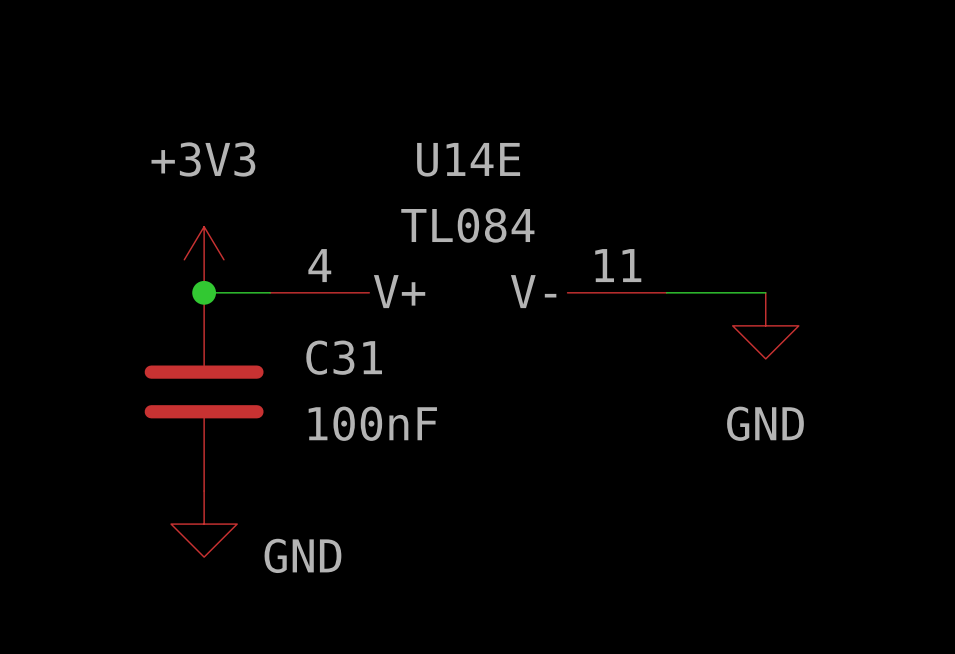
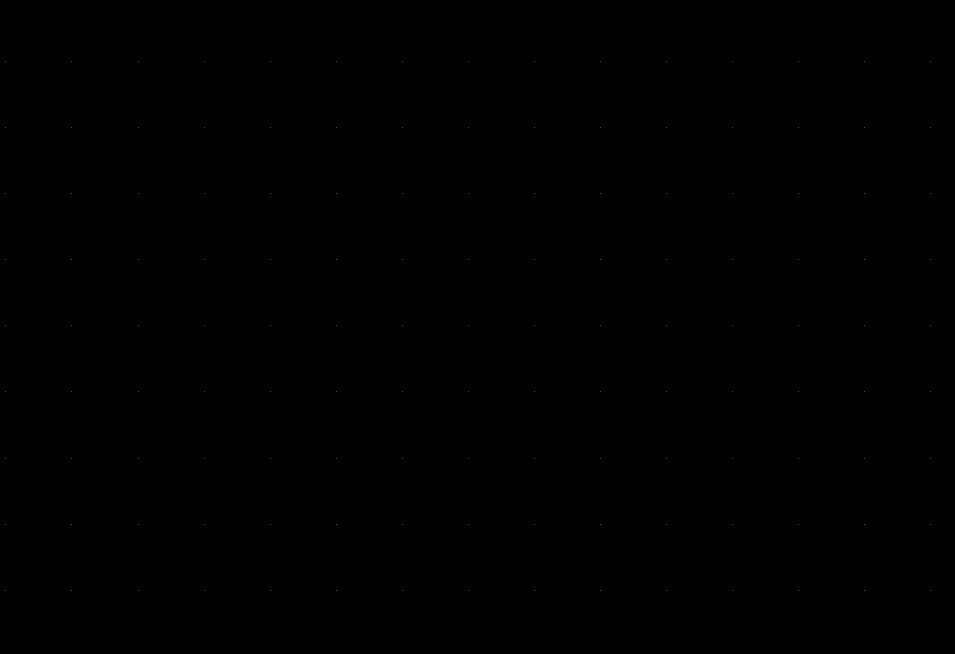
power symbol: +3V3 (204, 259) -> none
wire: (204, 292) (270, 292) -> none
junction: (204, 292) -> none
U14E: TL084 (468, 292) -> none
wire: (666, 292) (765, 292) -> none
power symbol: GND (765, 325) -> none
C31: 100nF (204, 391) -> none
power symbol: GND (204, 524) -> none

